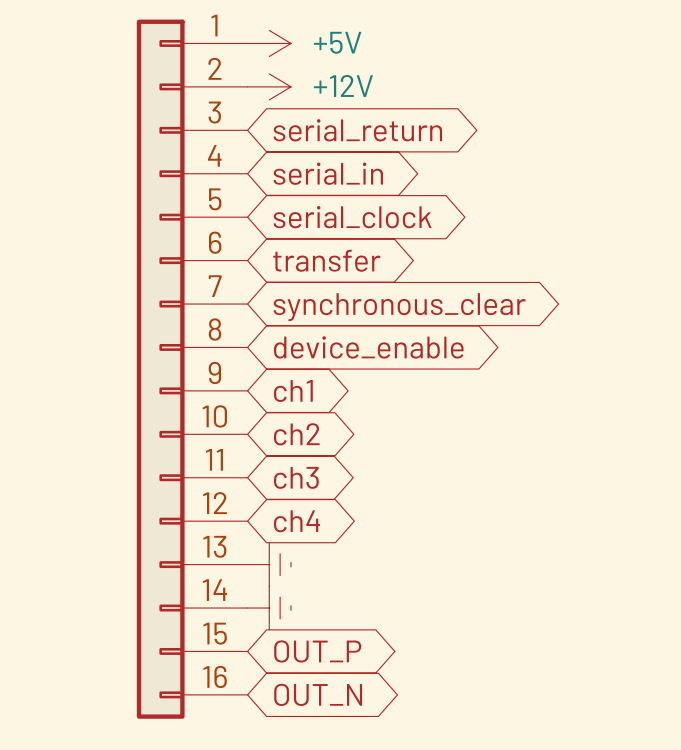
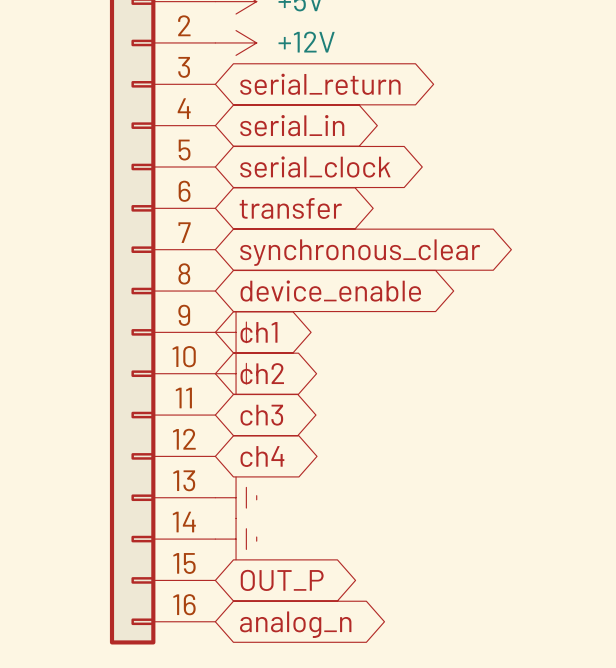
power symbol: none -> (236, 332)
power symbol: none -> (236, 373)
global label: OUT_N (318, 694) -> analog_n (295, 624)

